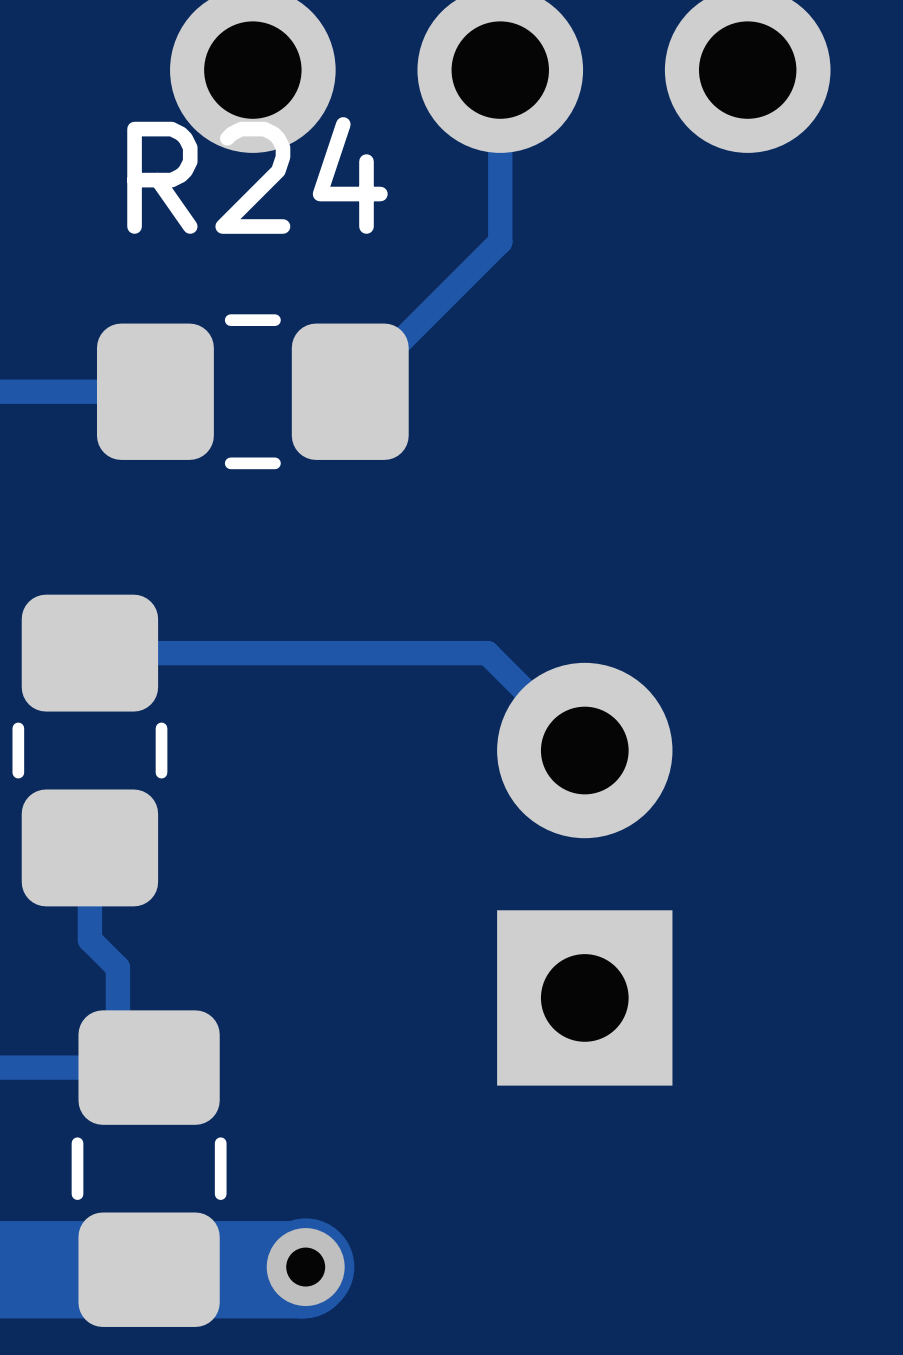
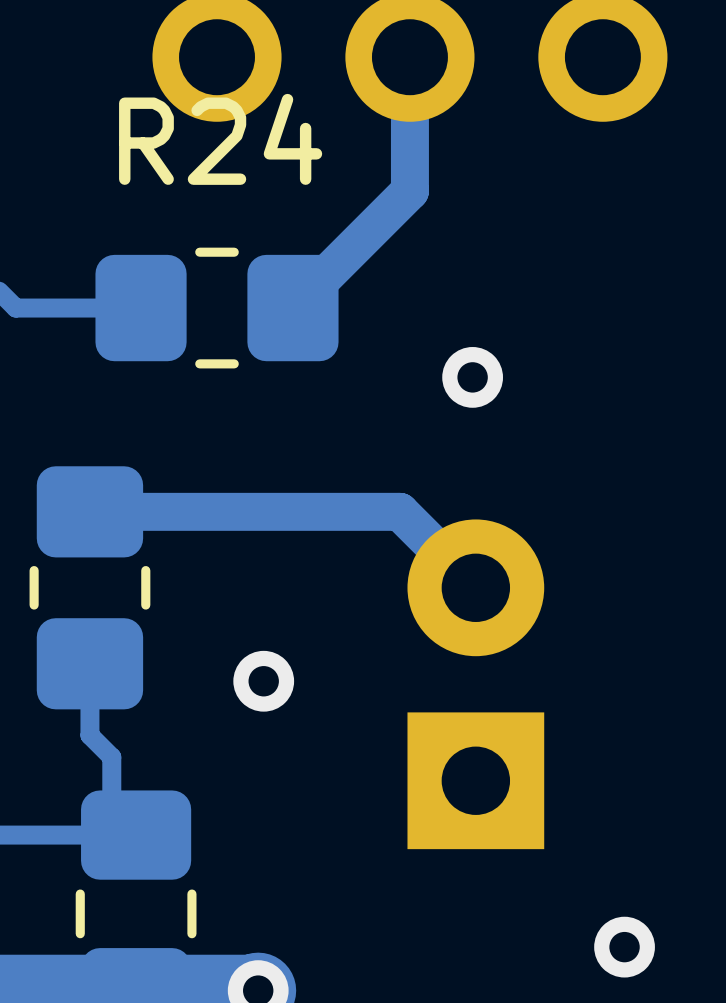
track width: thin (500, 70) (500, 241) (350, 391) -> thick (409, 57) (409, 191) (292, 308)
via: none -> (472, 377)
track width: thin (89, 653) (487, 653) (584, 750) -> thick (89, 511) (399, 511) (475, 587)
via: none -> (263, 681)
via: none -> (624, 947)

